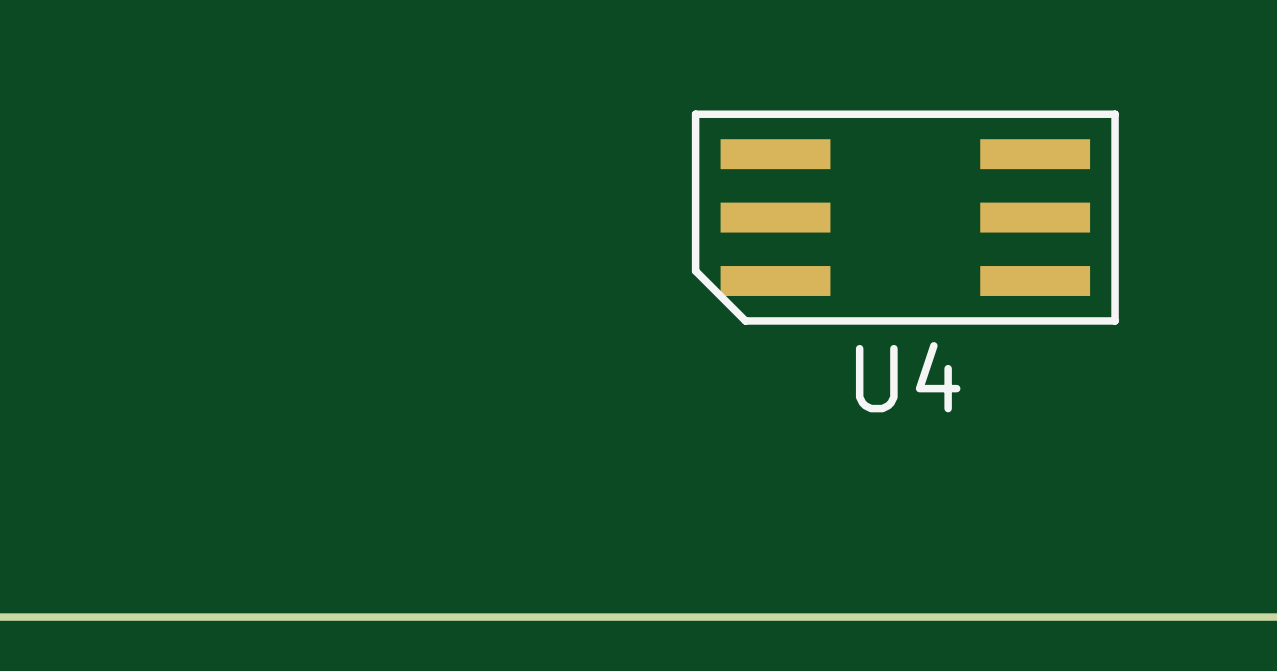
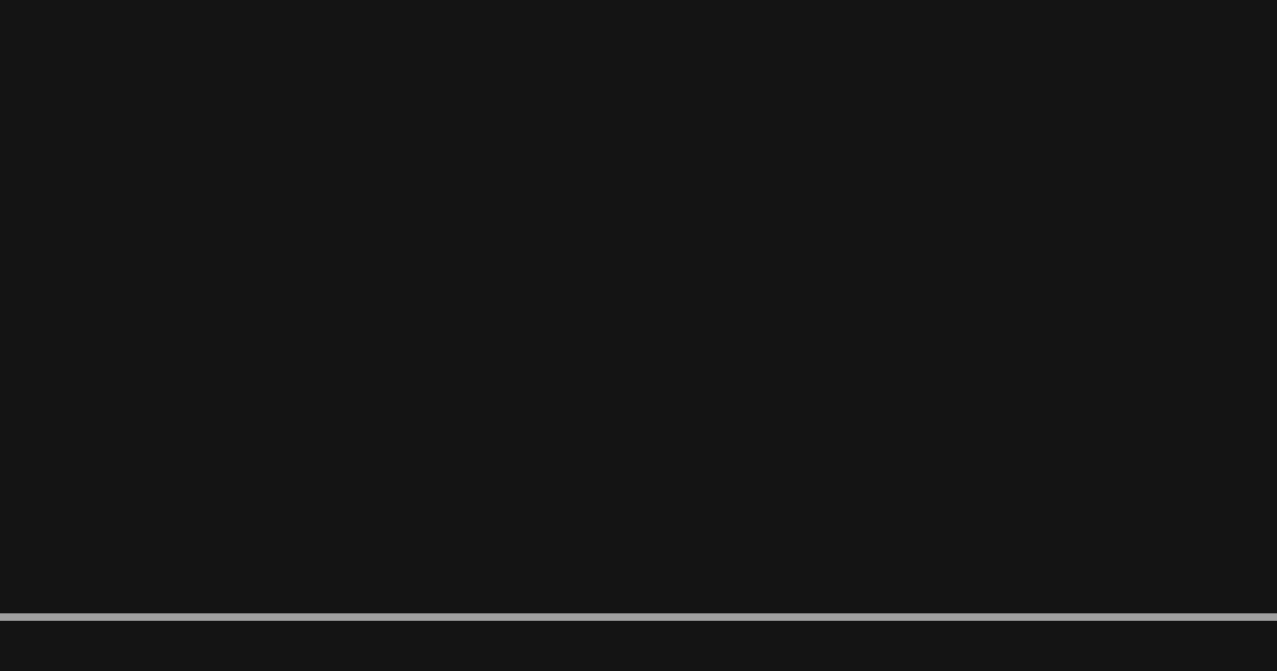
U4: (905, 217) -> none

